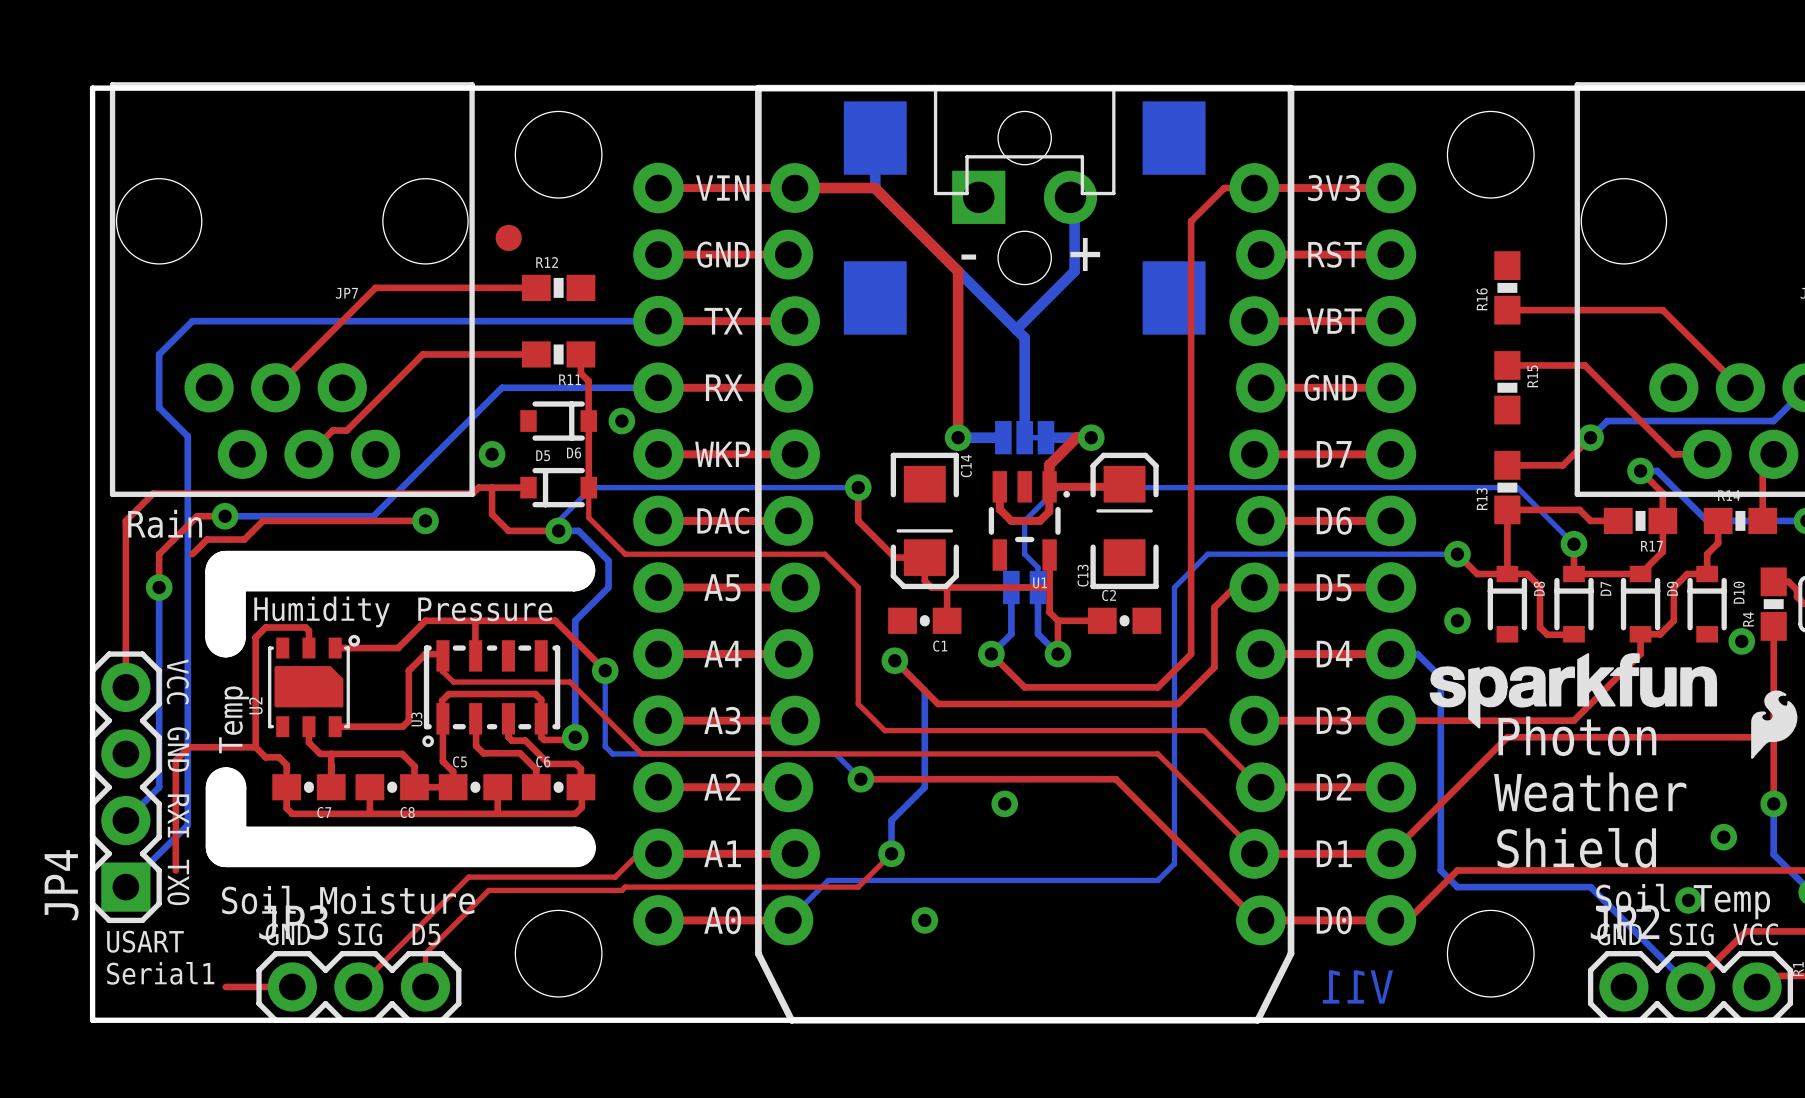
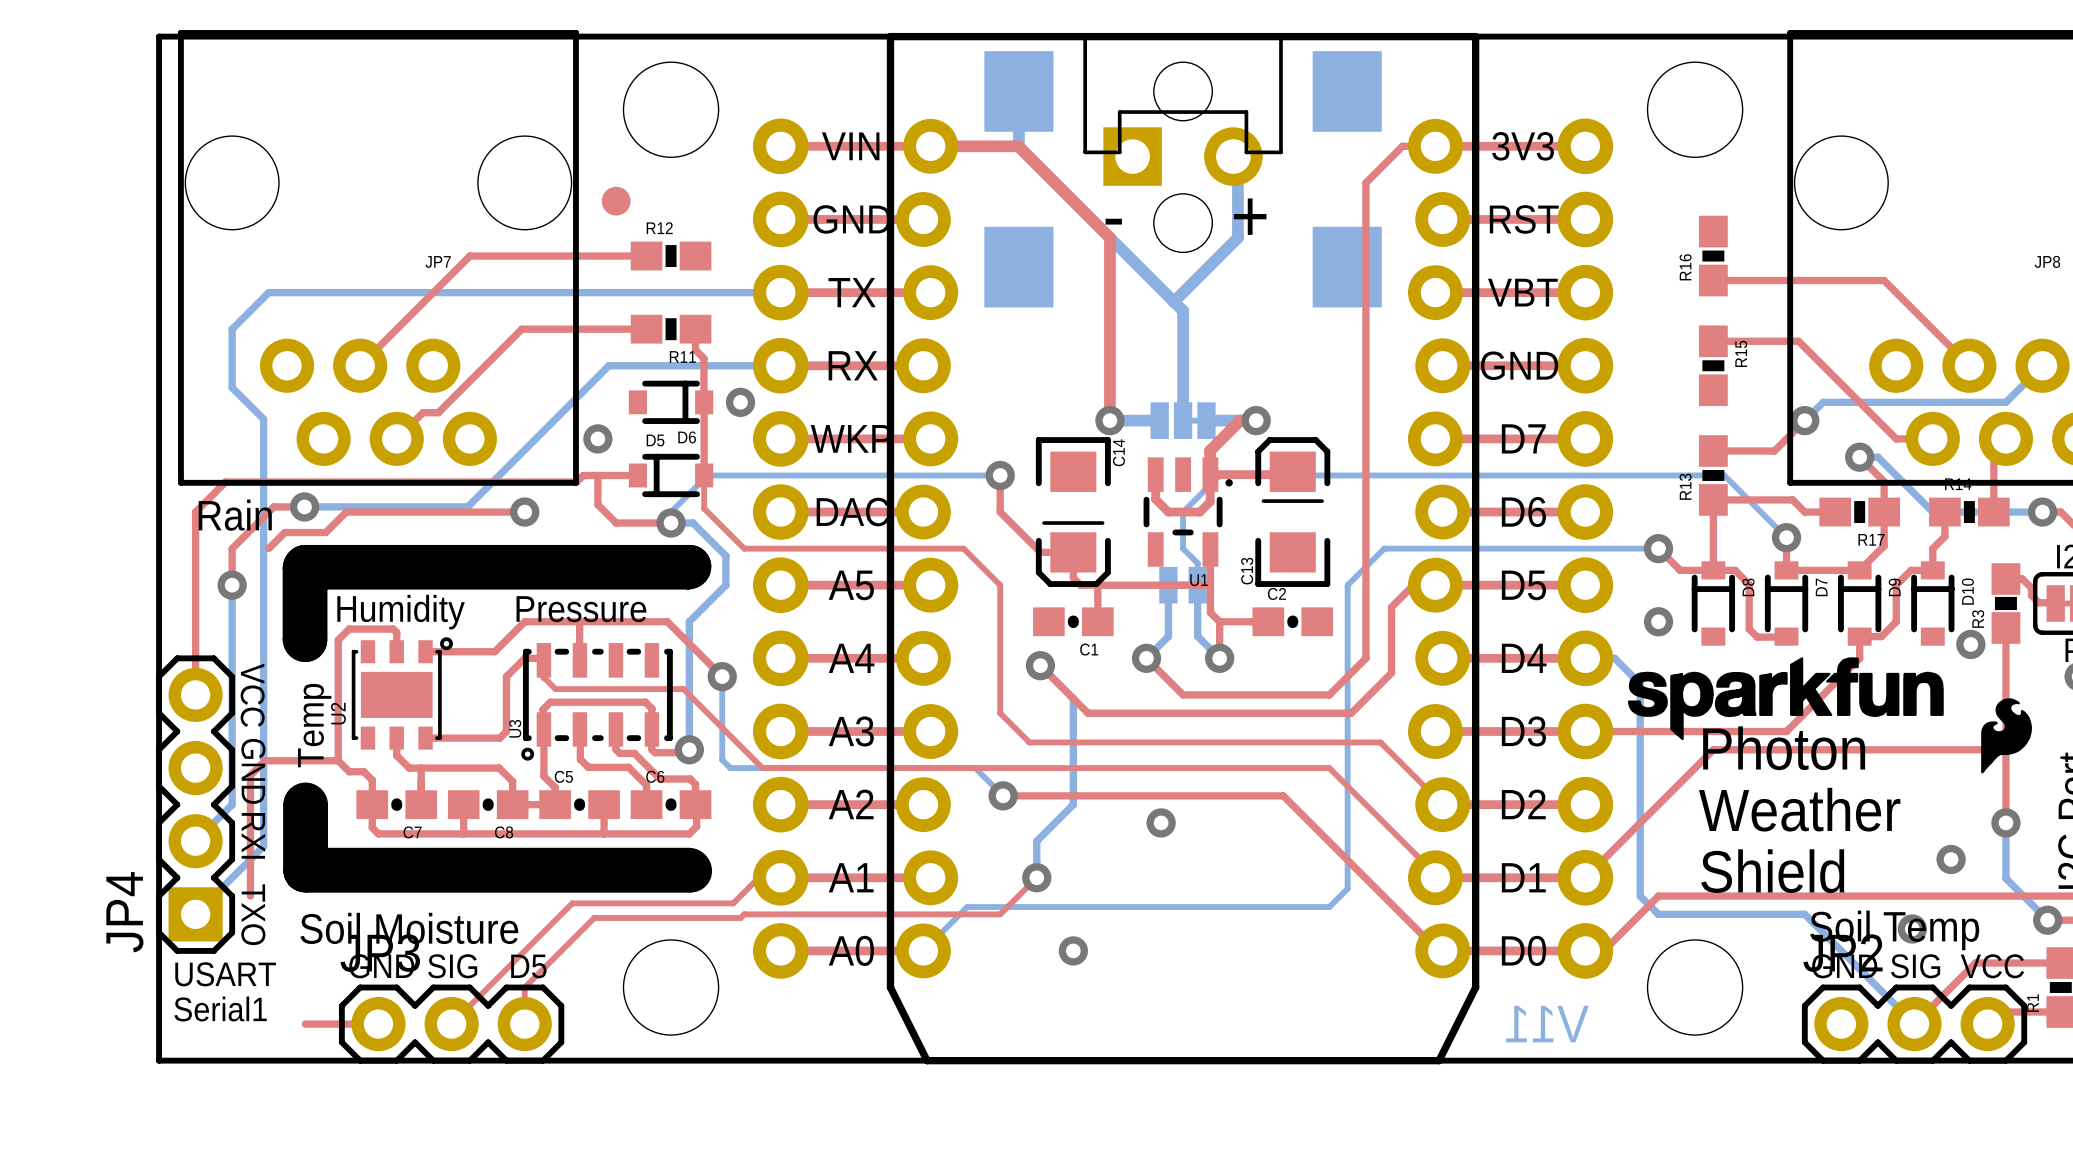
R4: (1773, 604) -> none
R3: none -> (2005, 603)
U2 footprint: [268, 634, 361, 738] -> [351, 637, 453, 750]

